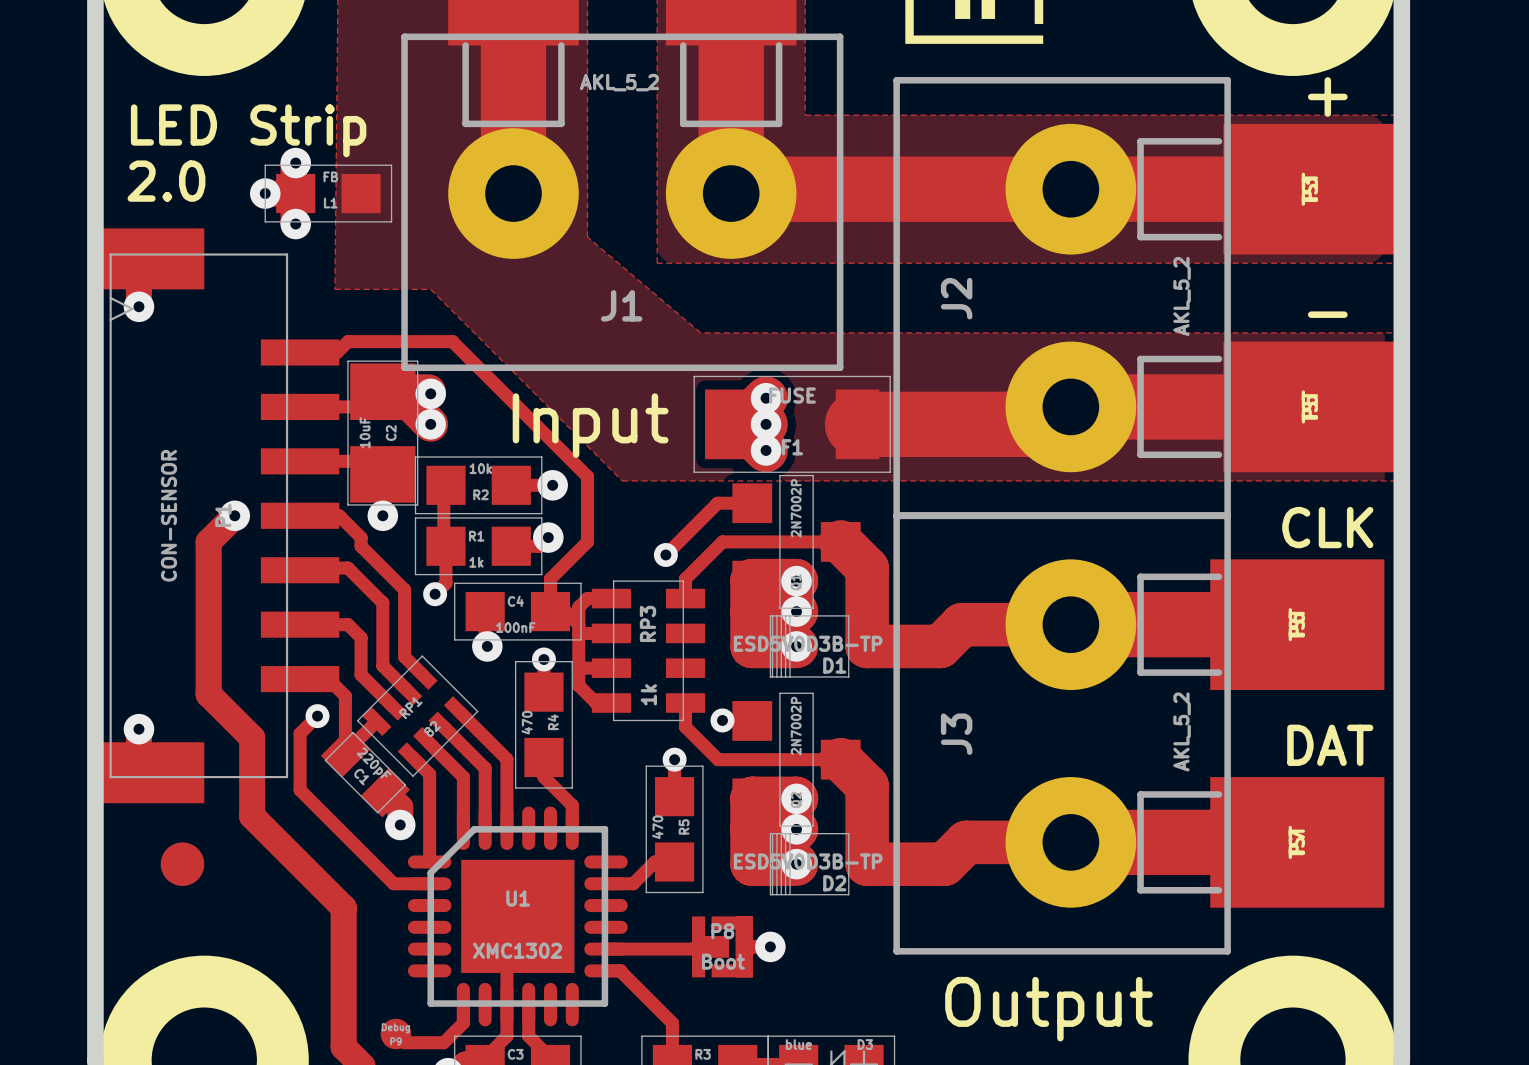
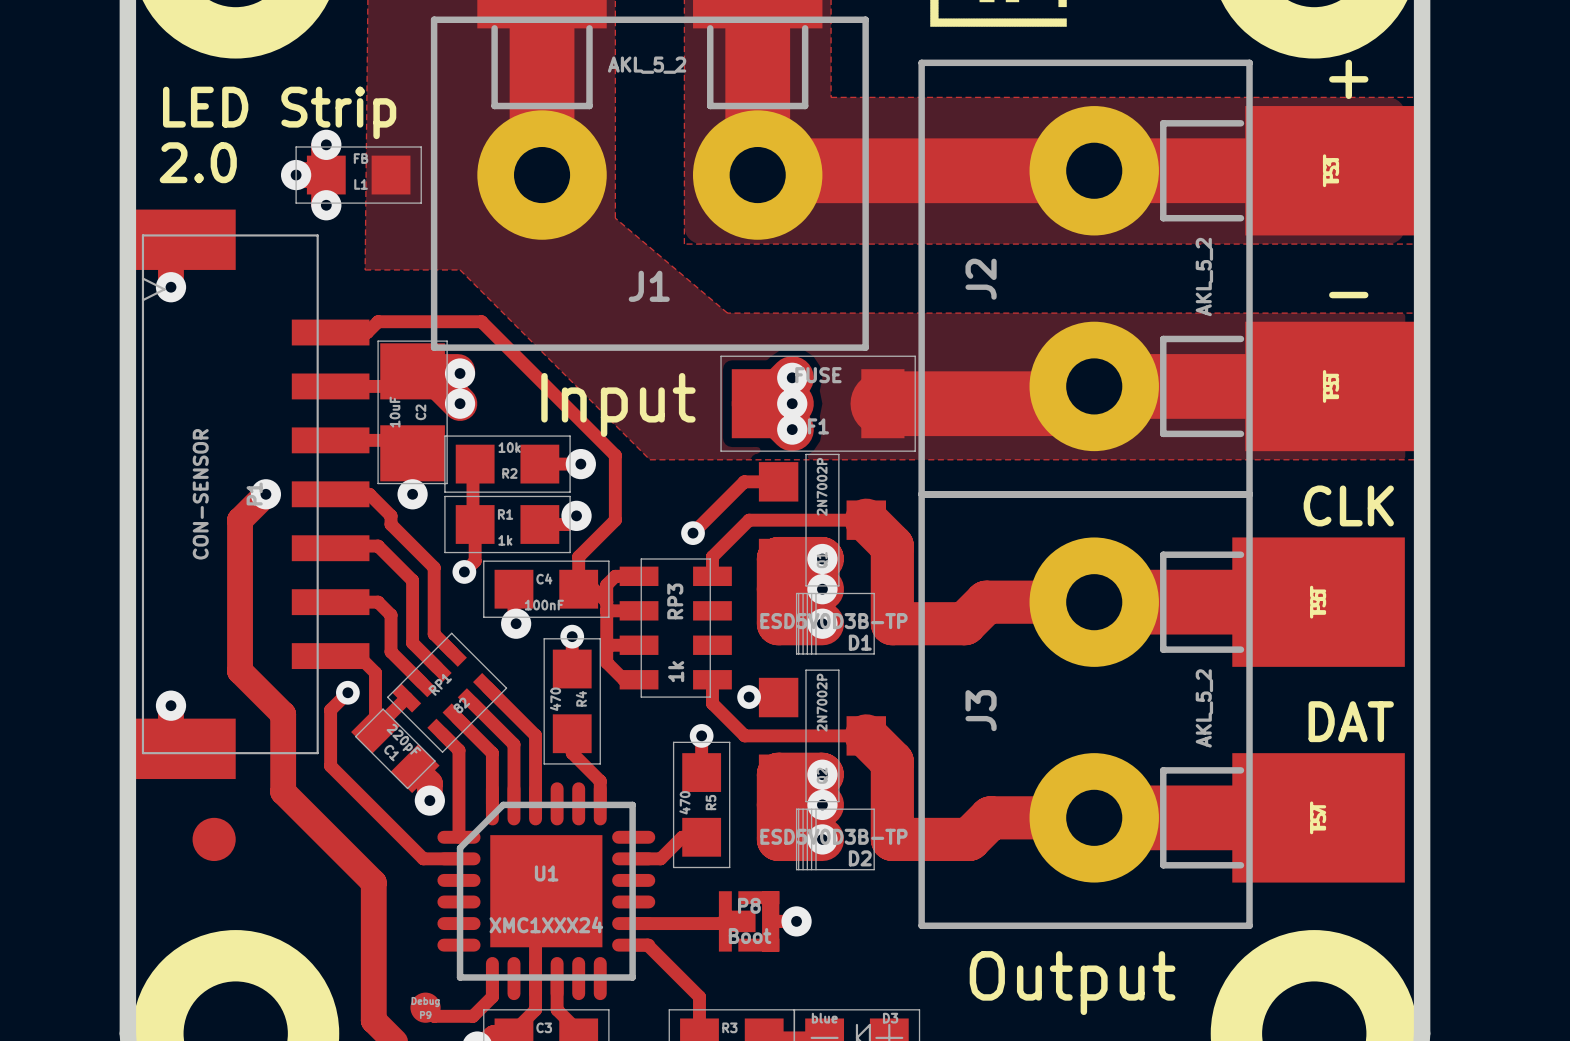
U1 value: XMC1302 (517, 950) -> XMC1XXX24 (546, 924)

